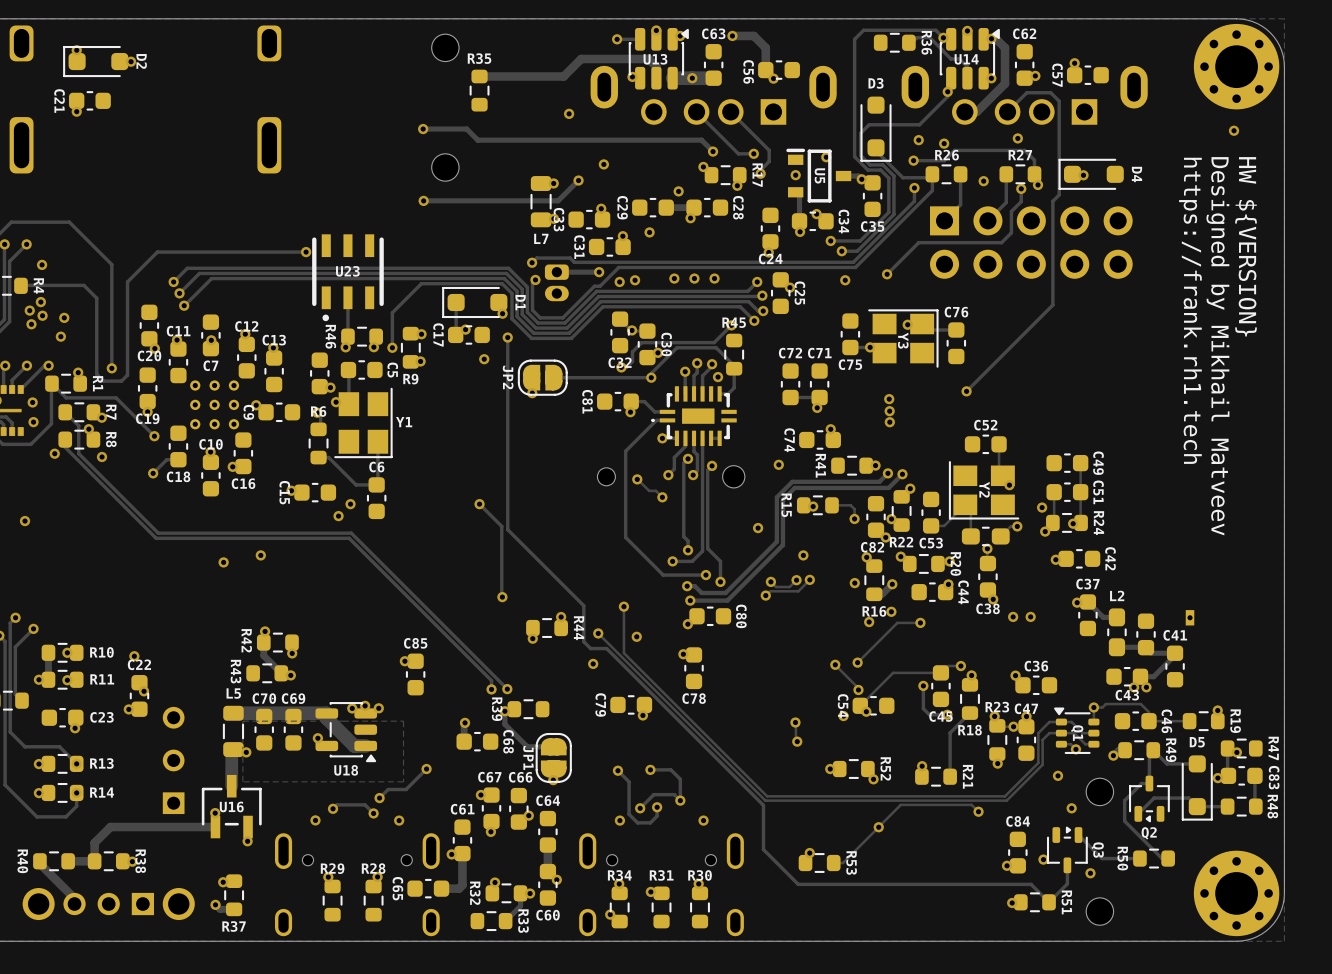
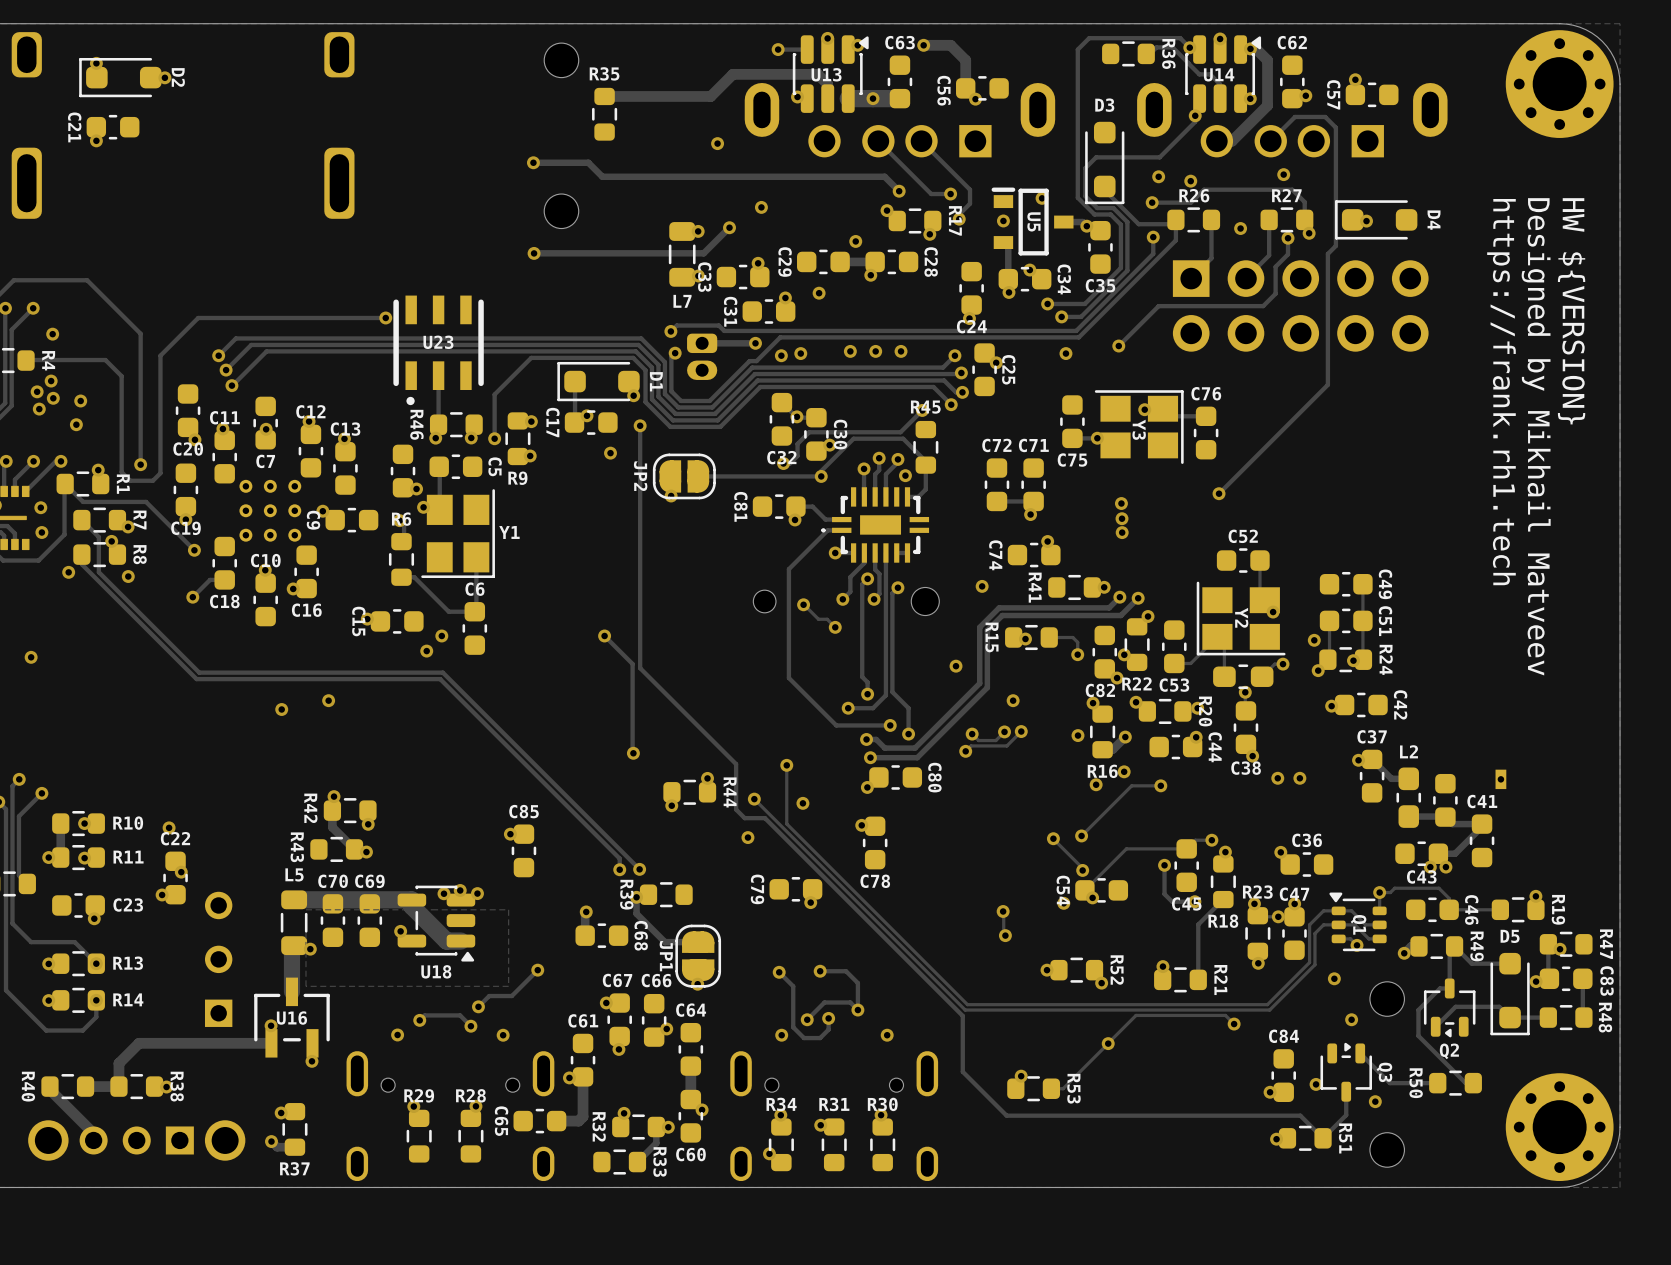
via: (1234, 130) -> none

